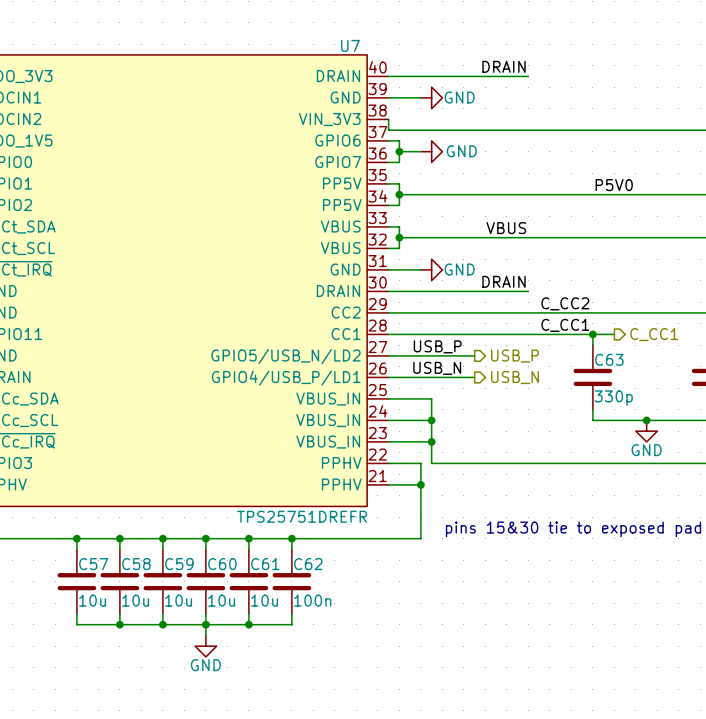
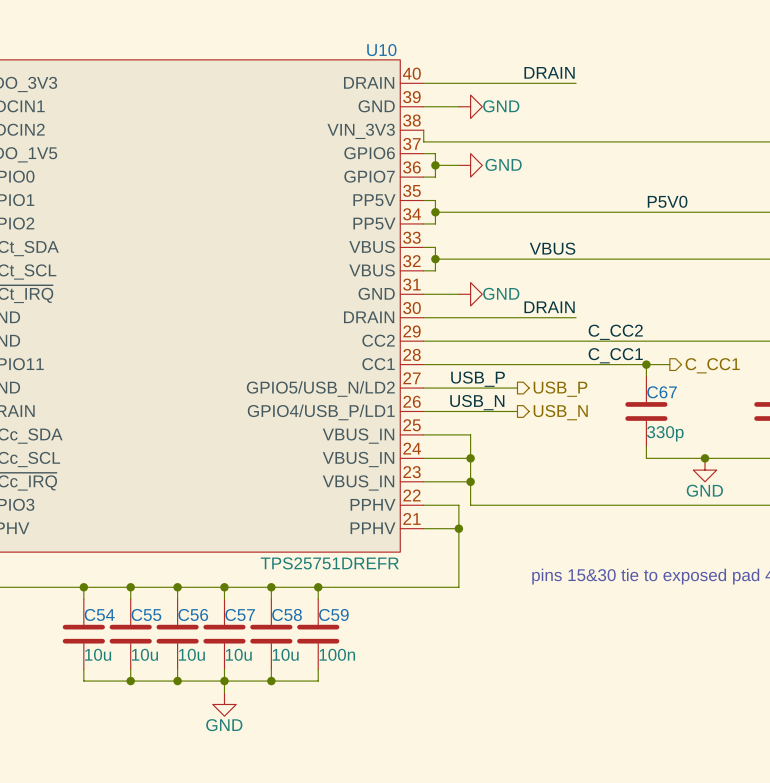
U7 name: U7 (350, 45) -> U10 (381, 50)
C63 name: C63 (609, 359) -> C67 (662, 392)
C57 name: C57 (93, 564) -> C54 (99, 614)
C58 name: C58 (136, 564) -> C55 (146, 614)
C59 name: C59 (179, 564) -> C56 (193, 614)
C60 name: C60 (222, 564) -> C57 (240, 614)
C61 name: C61 (265, 564) -> C58 (287, 614)
C62 name: C62 (308, 564) -> C59 (333, 614)

